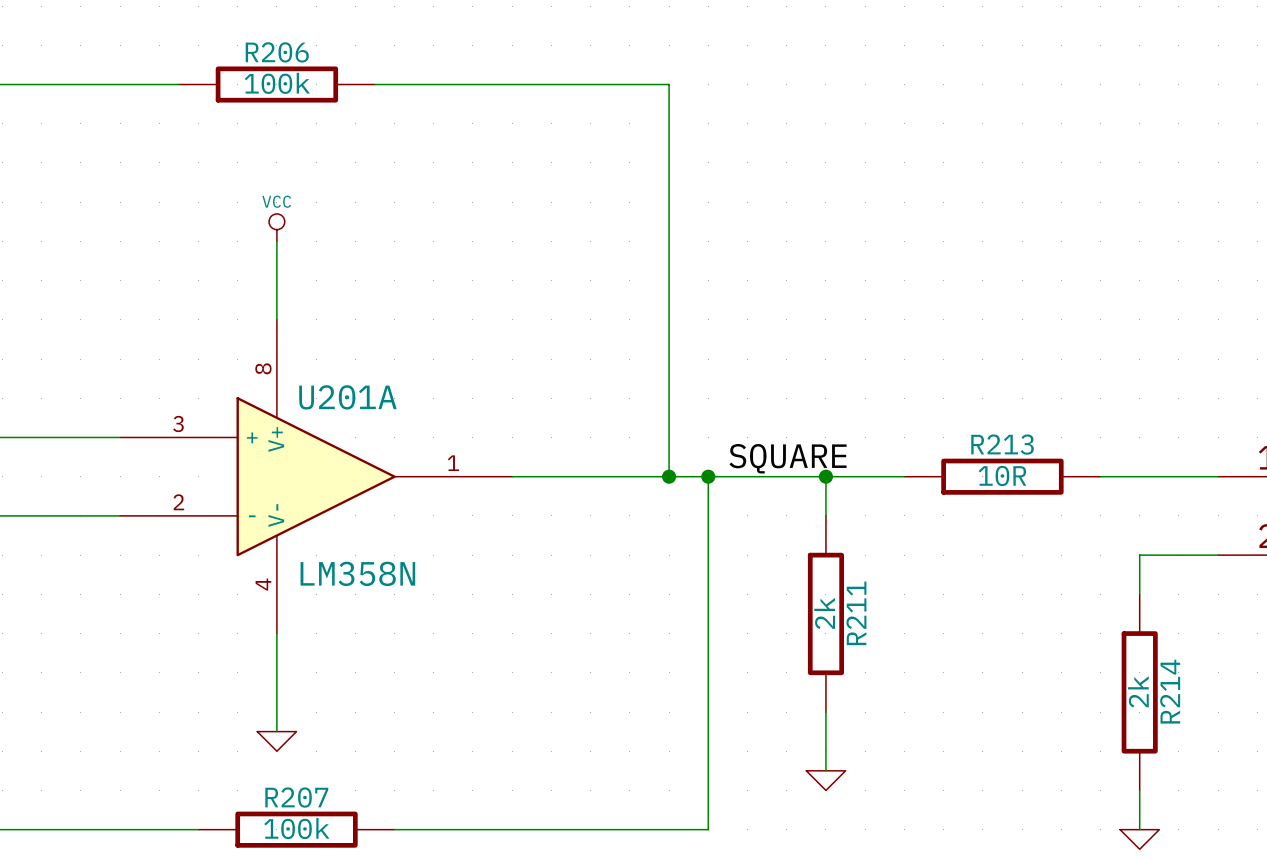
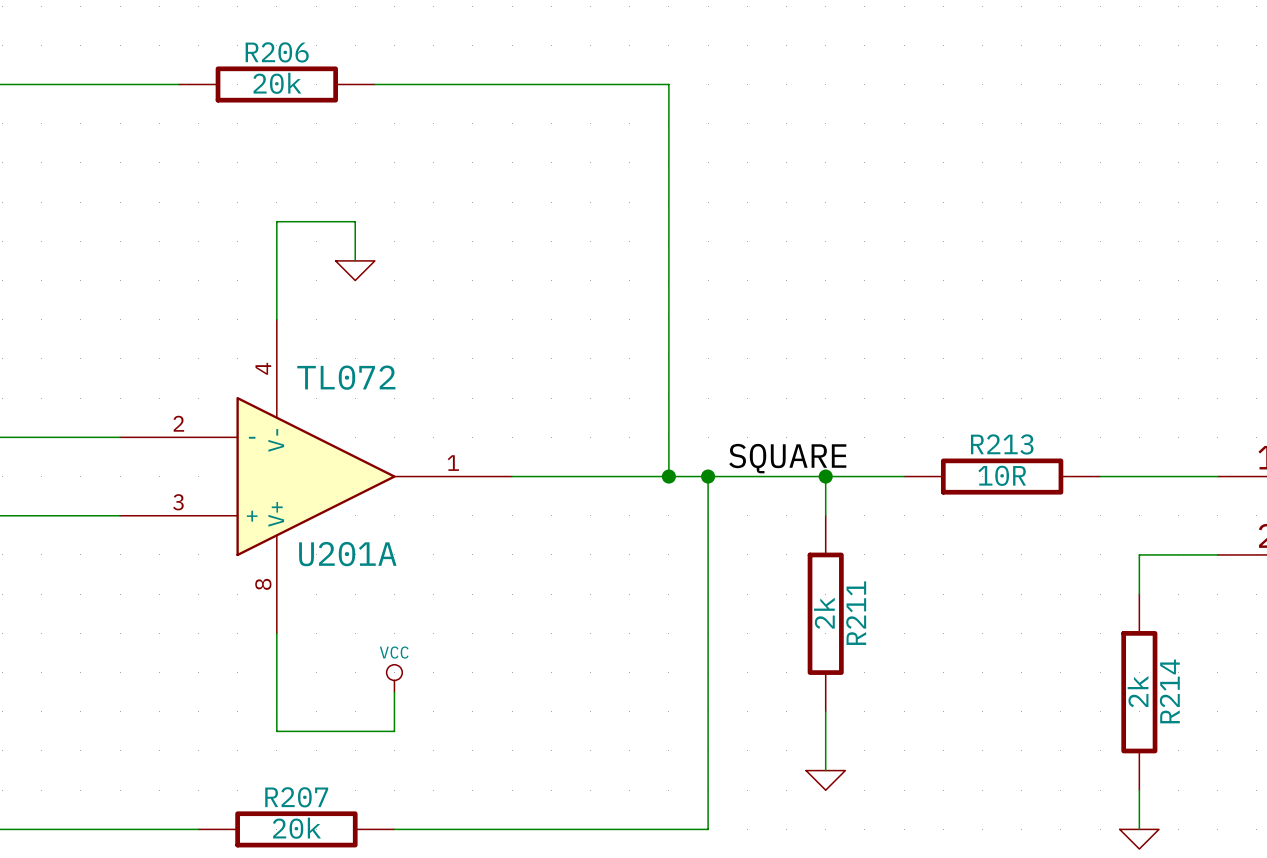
R206 value: 100k (277, 83) -> 20k (277, 83)
power symbol: VCC (276, 227) -> none
wire: none -> (276, 241) (276, 221) (355, 221) (355, 260)
power symbol: none -> (355, 270)
U201A flip: as is (316, 476) -> up-down (316, 476)
U201A value: LM358N (357, 573) -> TL072 (346, 377)
power symbol: none -> VCC (394, 678)
wire: none -> (394, 692) (394, 731) (276, 731)
power symbol: (276, 741) -> none
R207 value: 100k (296, 828) -> 20k (296, 828)

